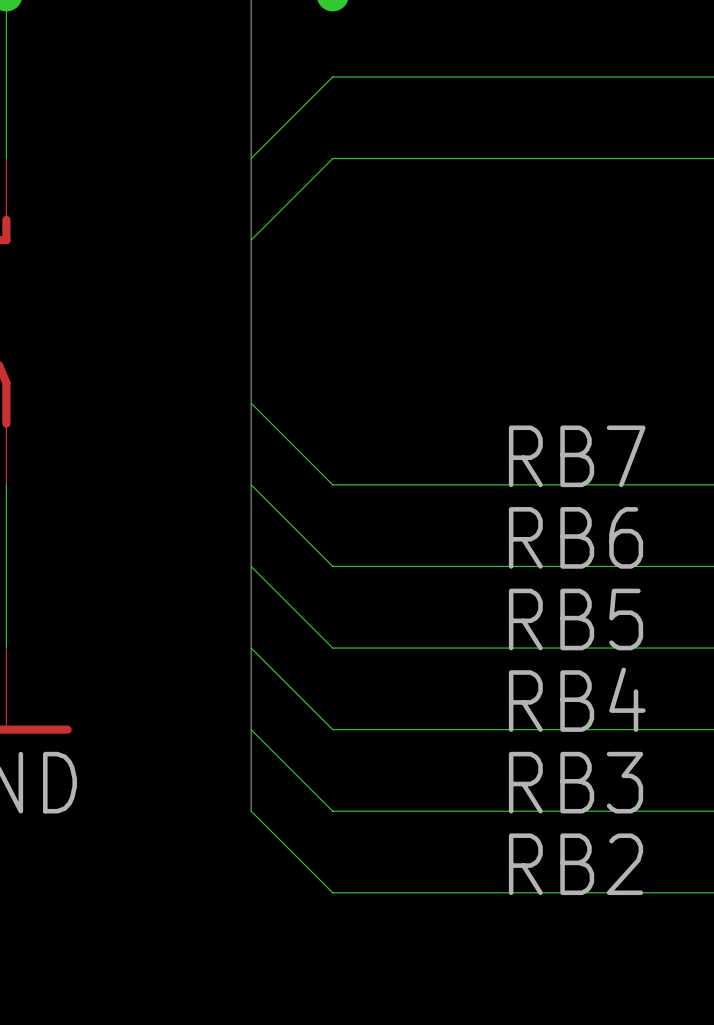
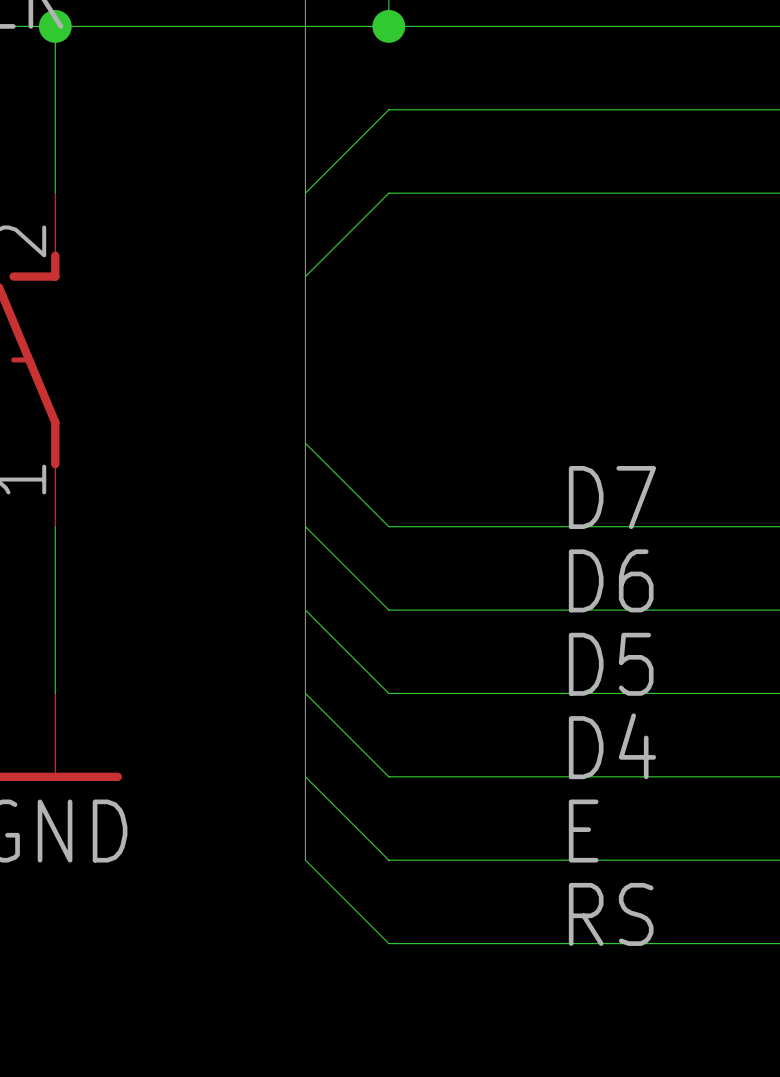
label: RB7 (577, 456) -> D7 (612, 497)
label: RB6 (576, 537) -> D6 (611, 580)
label: RB5 (576, 619) -> D5 (611, 664)
label: RB4 (577, 699) -> D4 (612, 746)
label: RB3 (576, 782) -> E (583, 831)
label: RB2 (576, 864) -> RS (611, 914)

